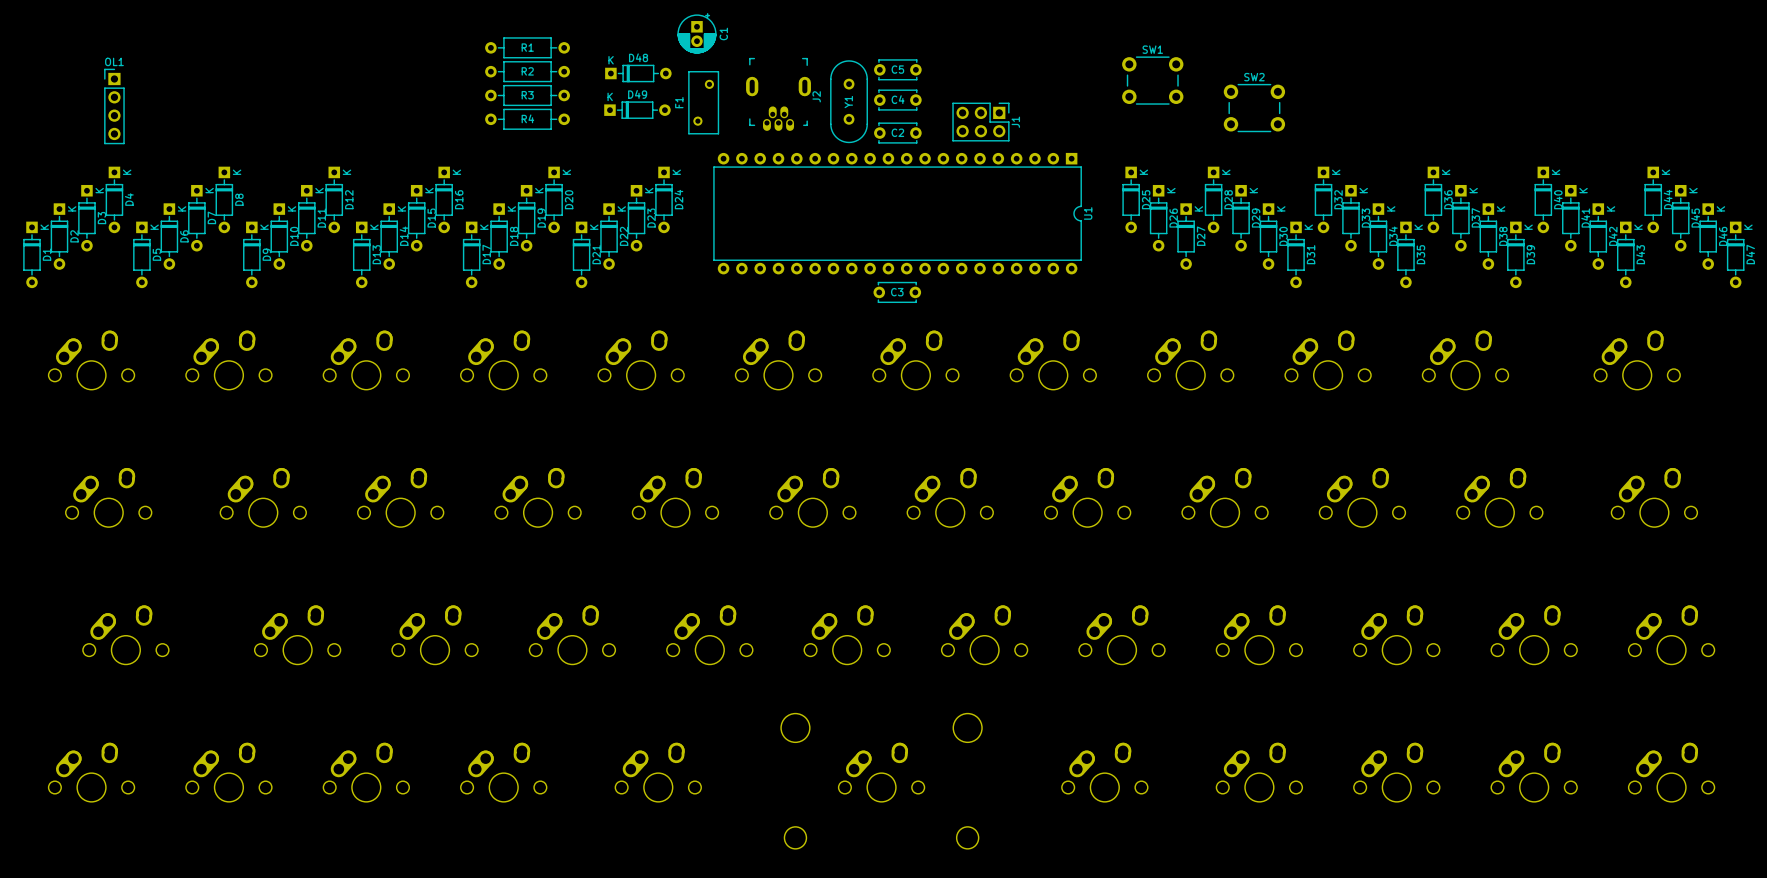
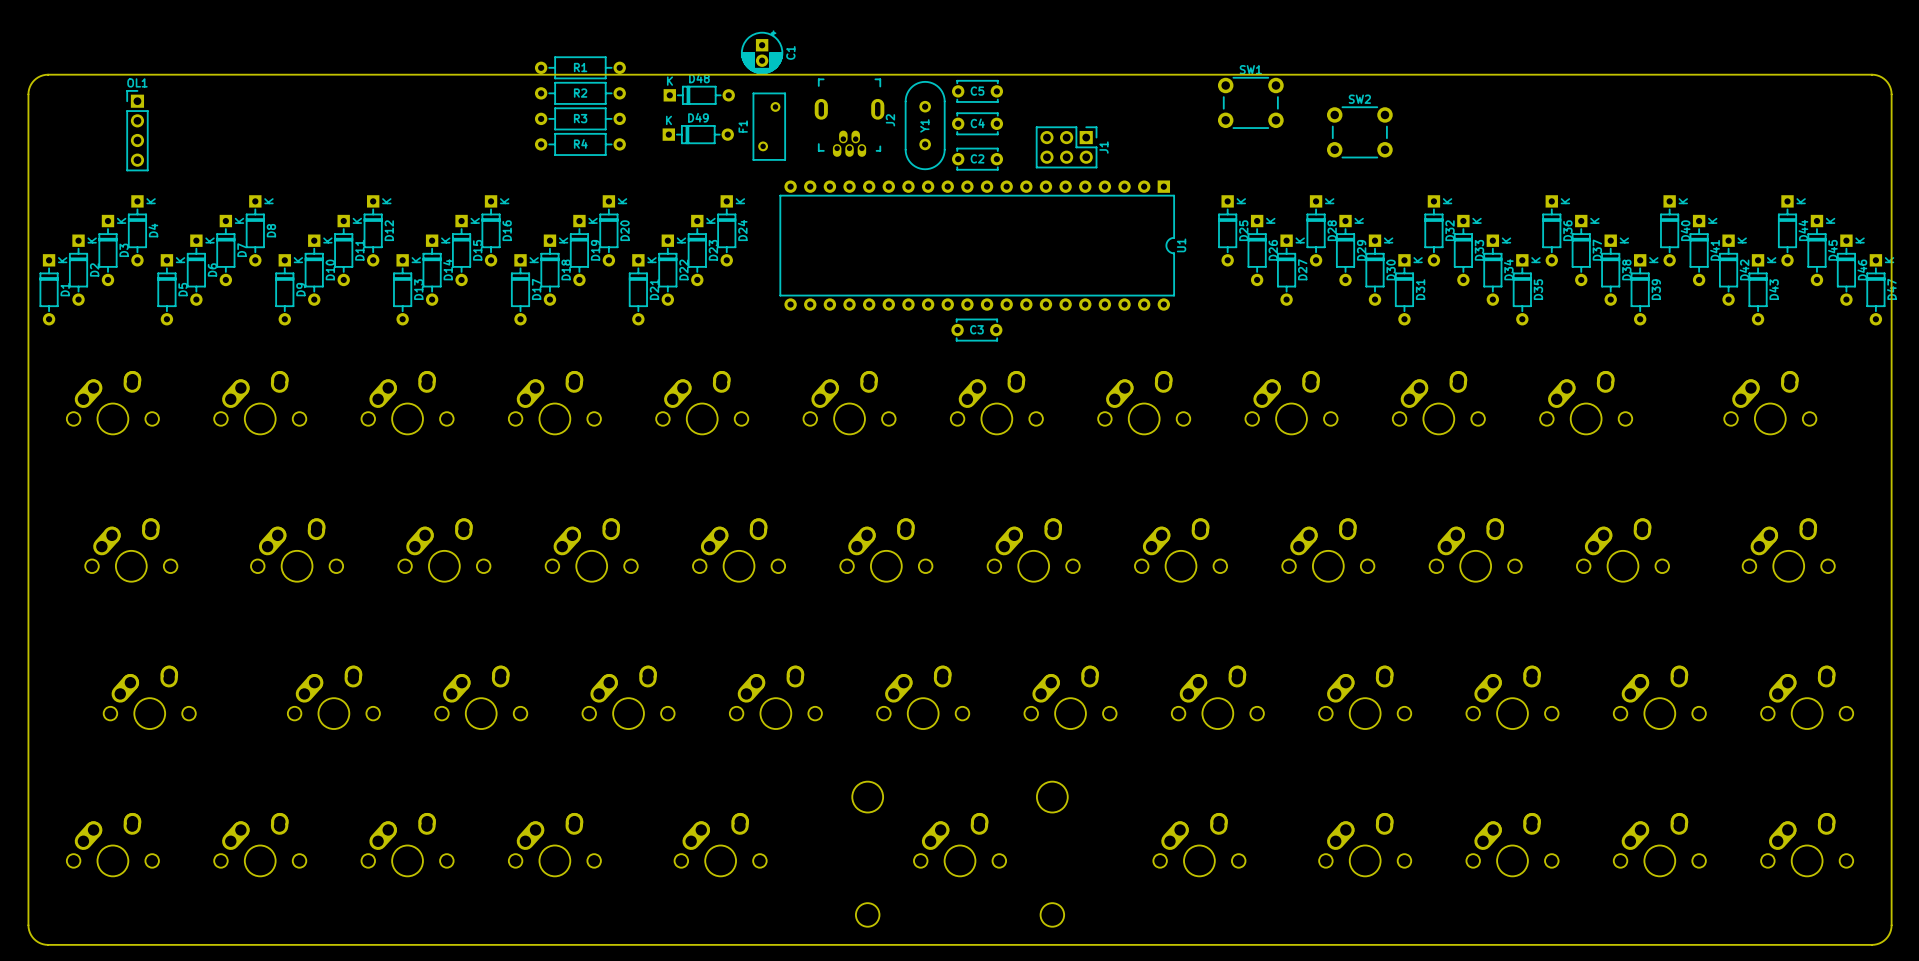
board edge: none -> (48, 74) (1879, 76) (1887, 82) (1891, 94) (1890, 932) (1881, 942) (1871, 944) (40, 943) (31, 935) (28, 925) (28, 94) (34, 80) (48, 74)

